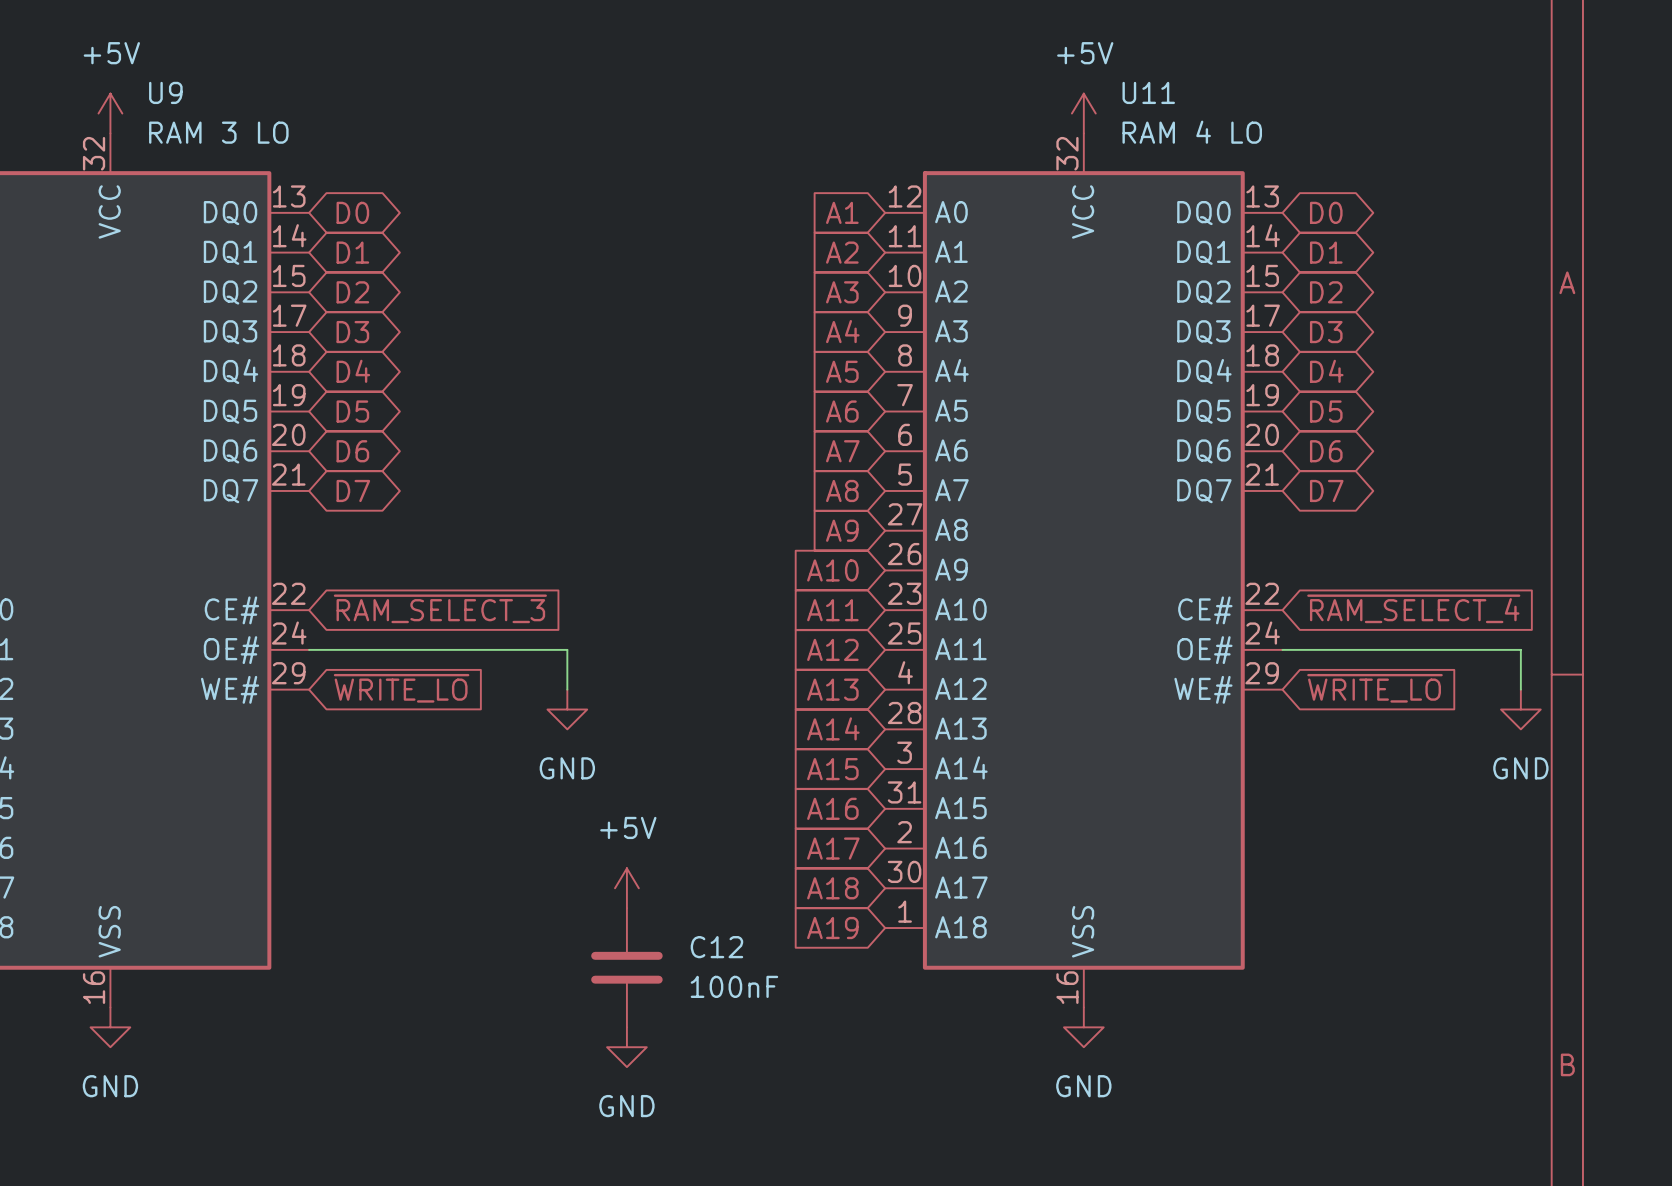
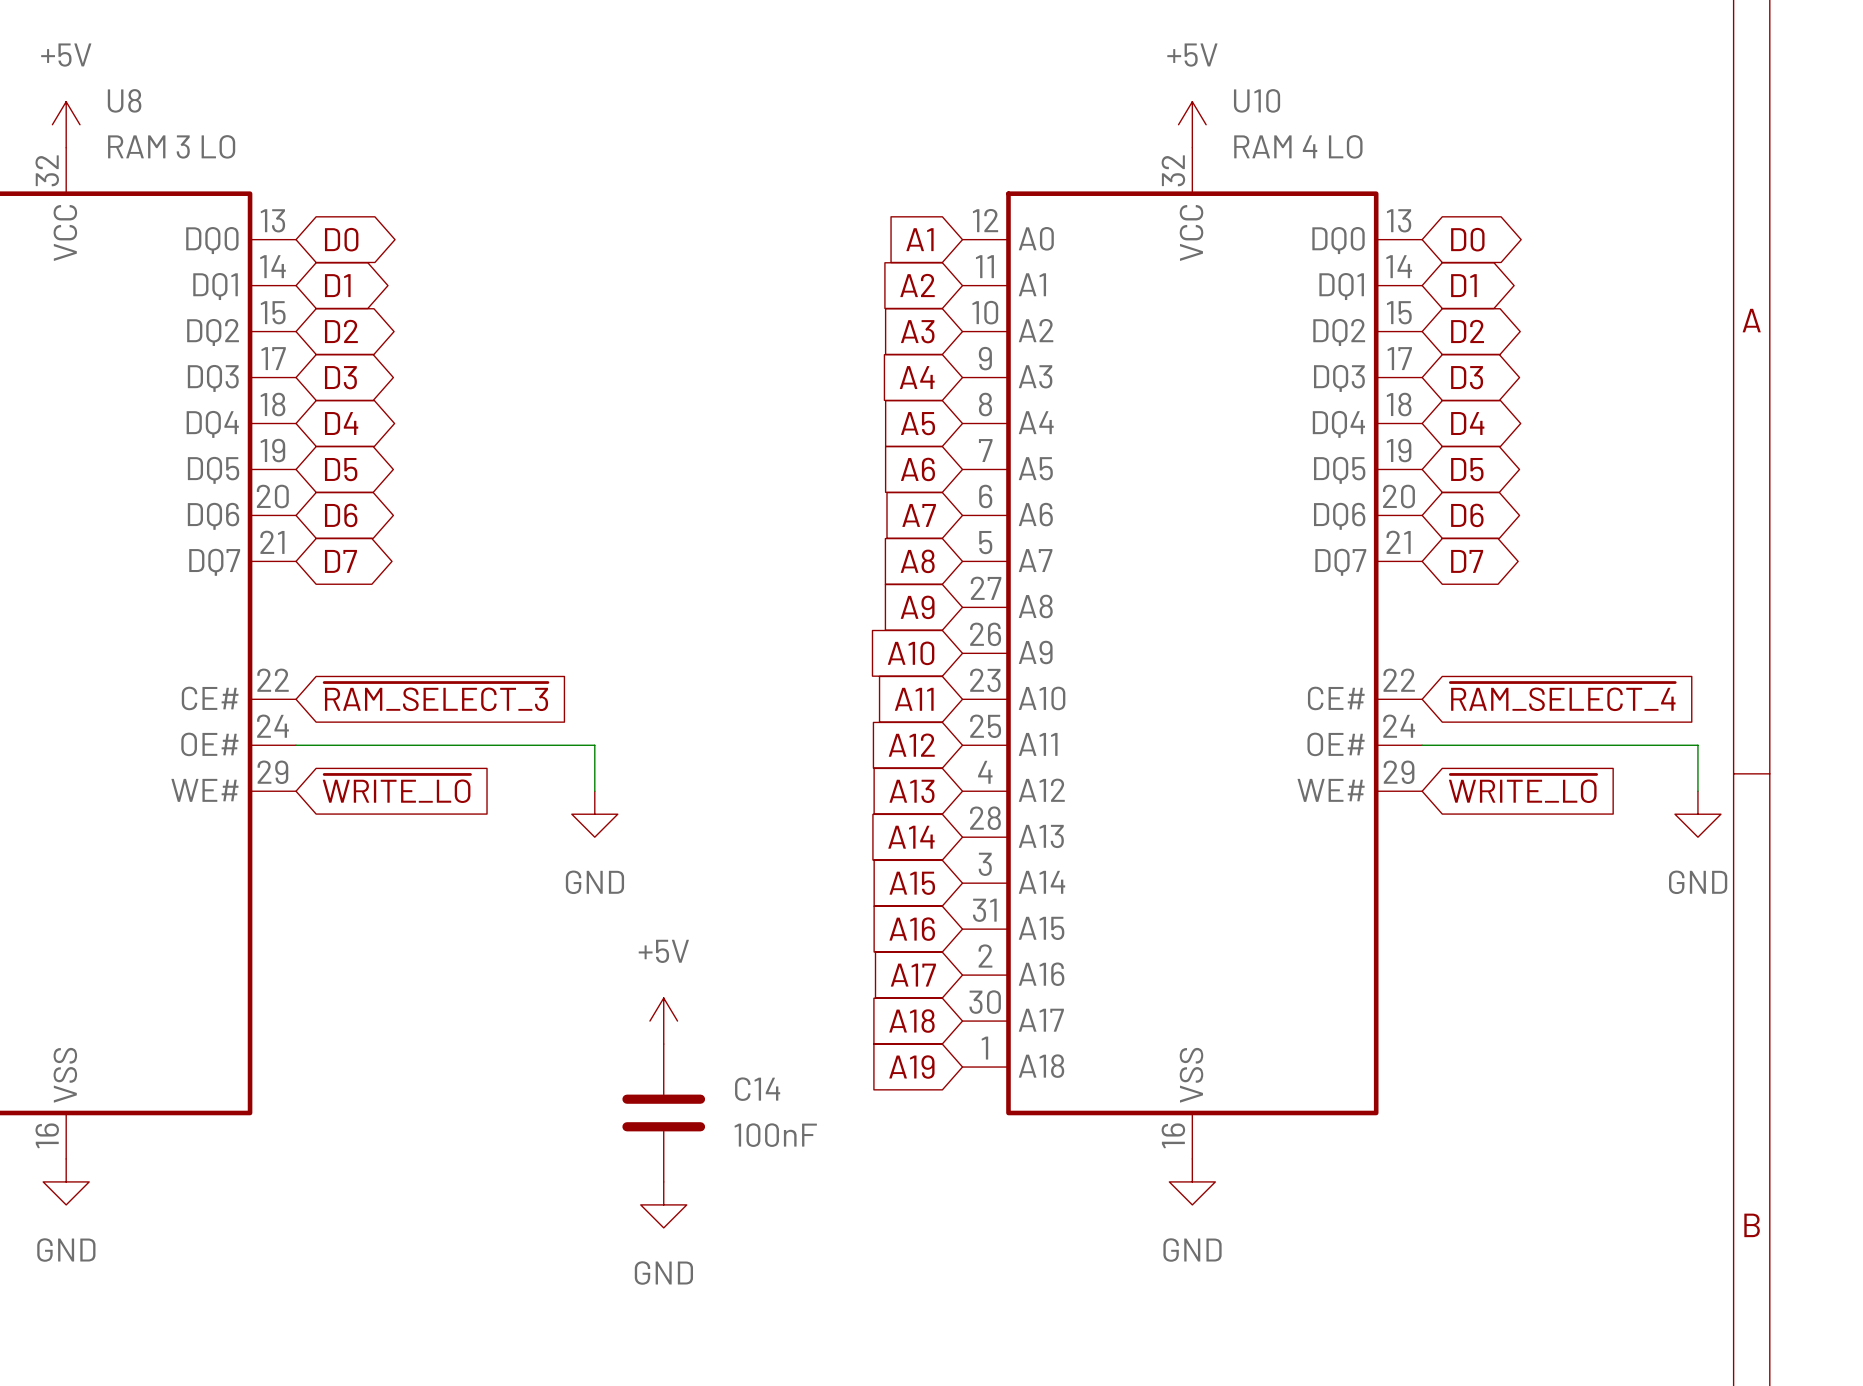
U9 name: U9 (165, 92) -> U8 (124, 100)
U11 name: U11 (1148, 92) -> U10 (1257, 100)
C12 name: C12 (716, 947) -> C14 (757, 1089)

